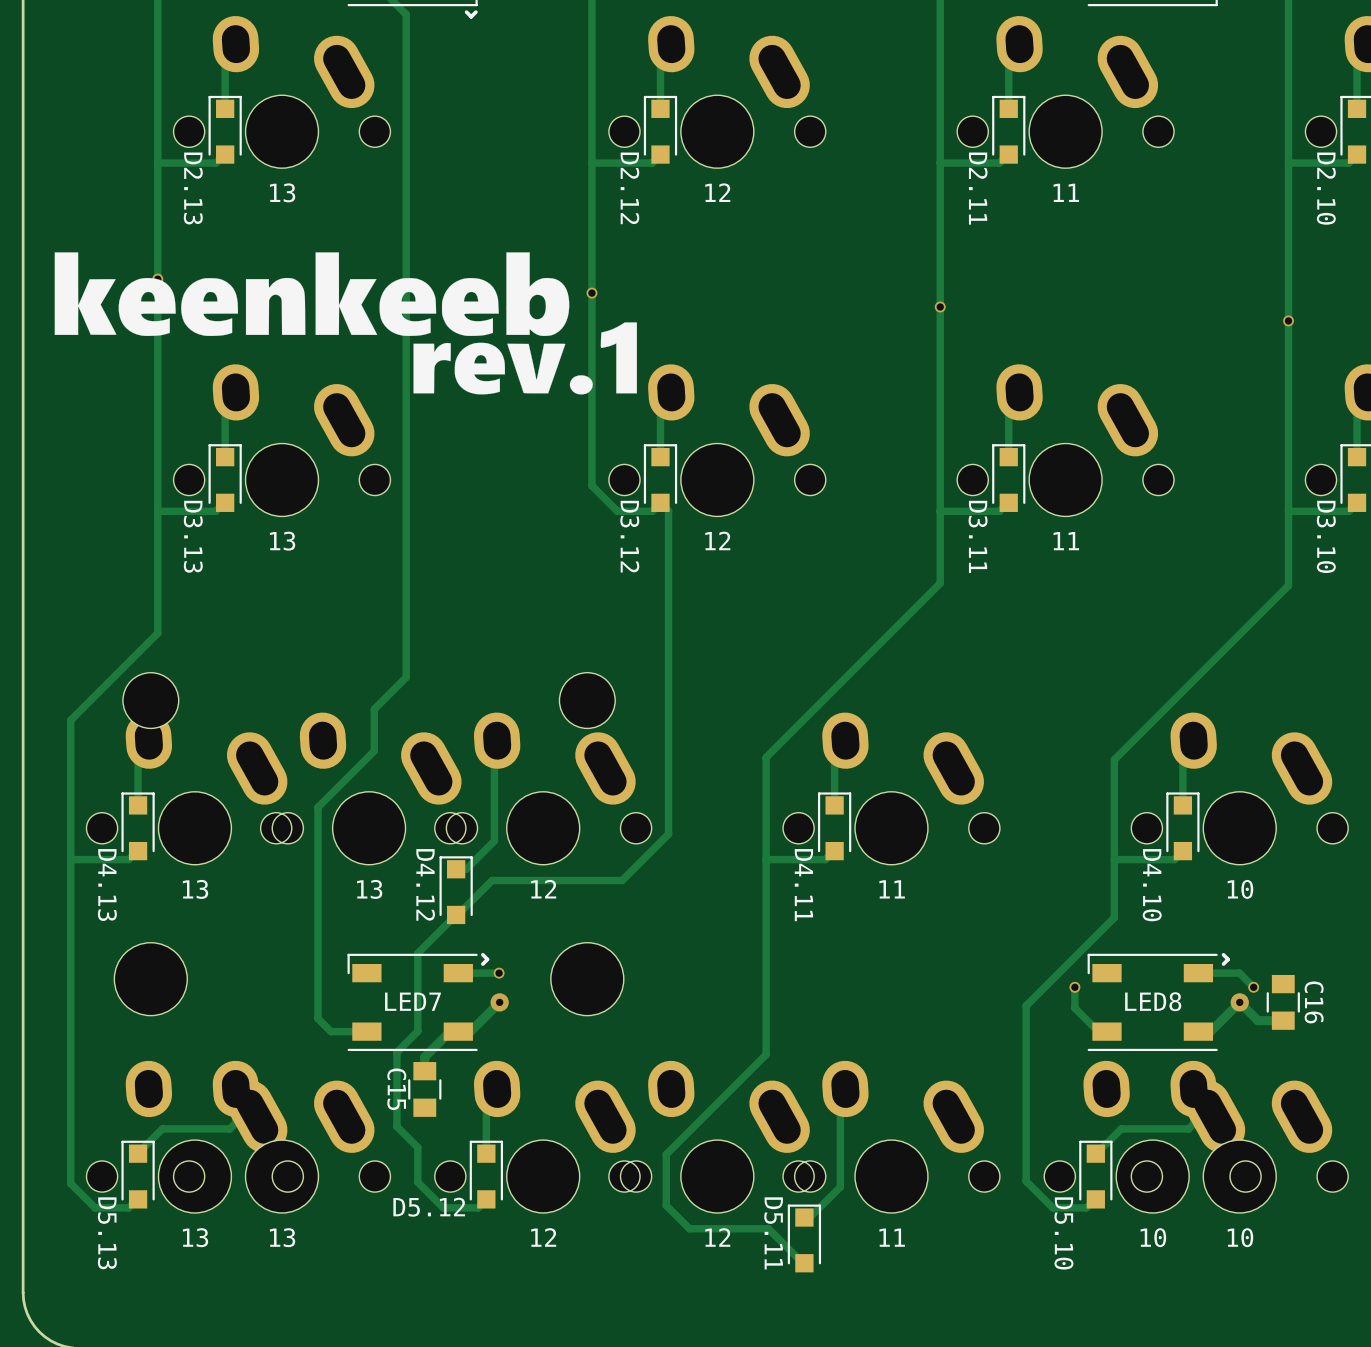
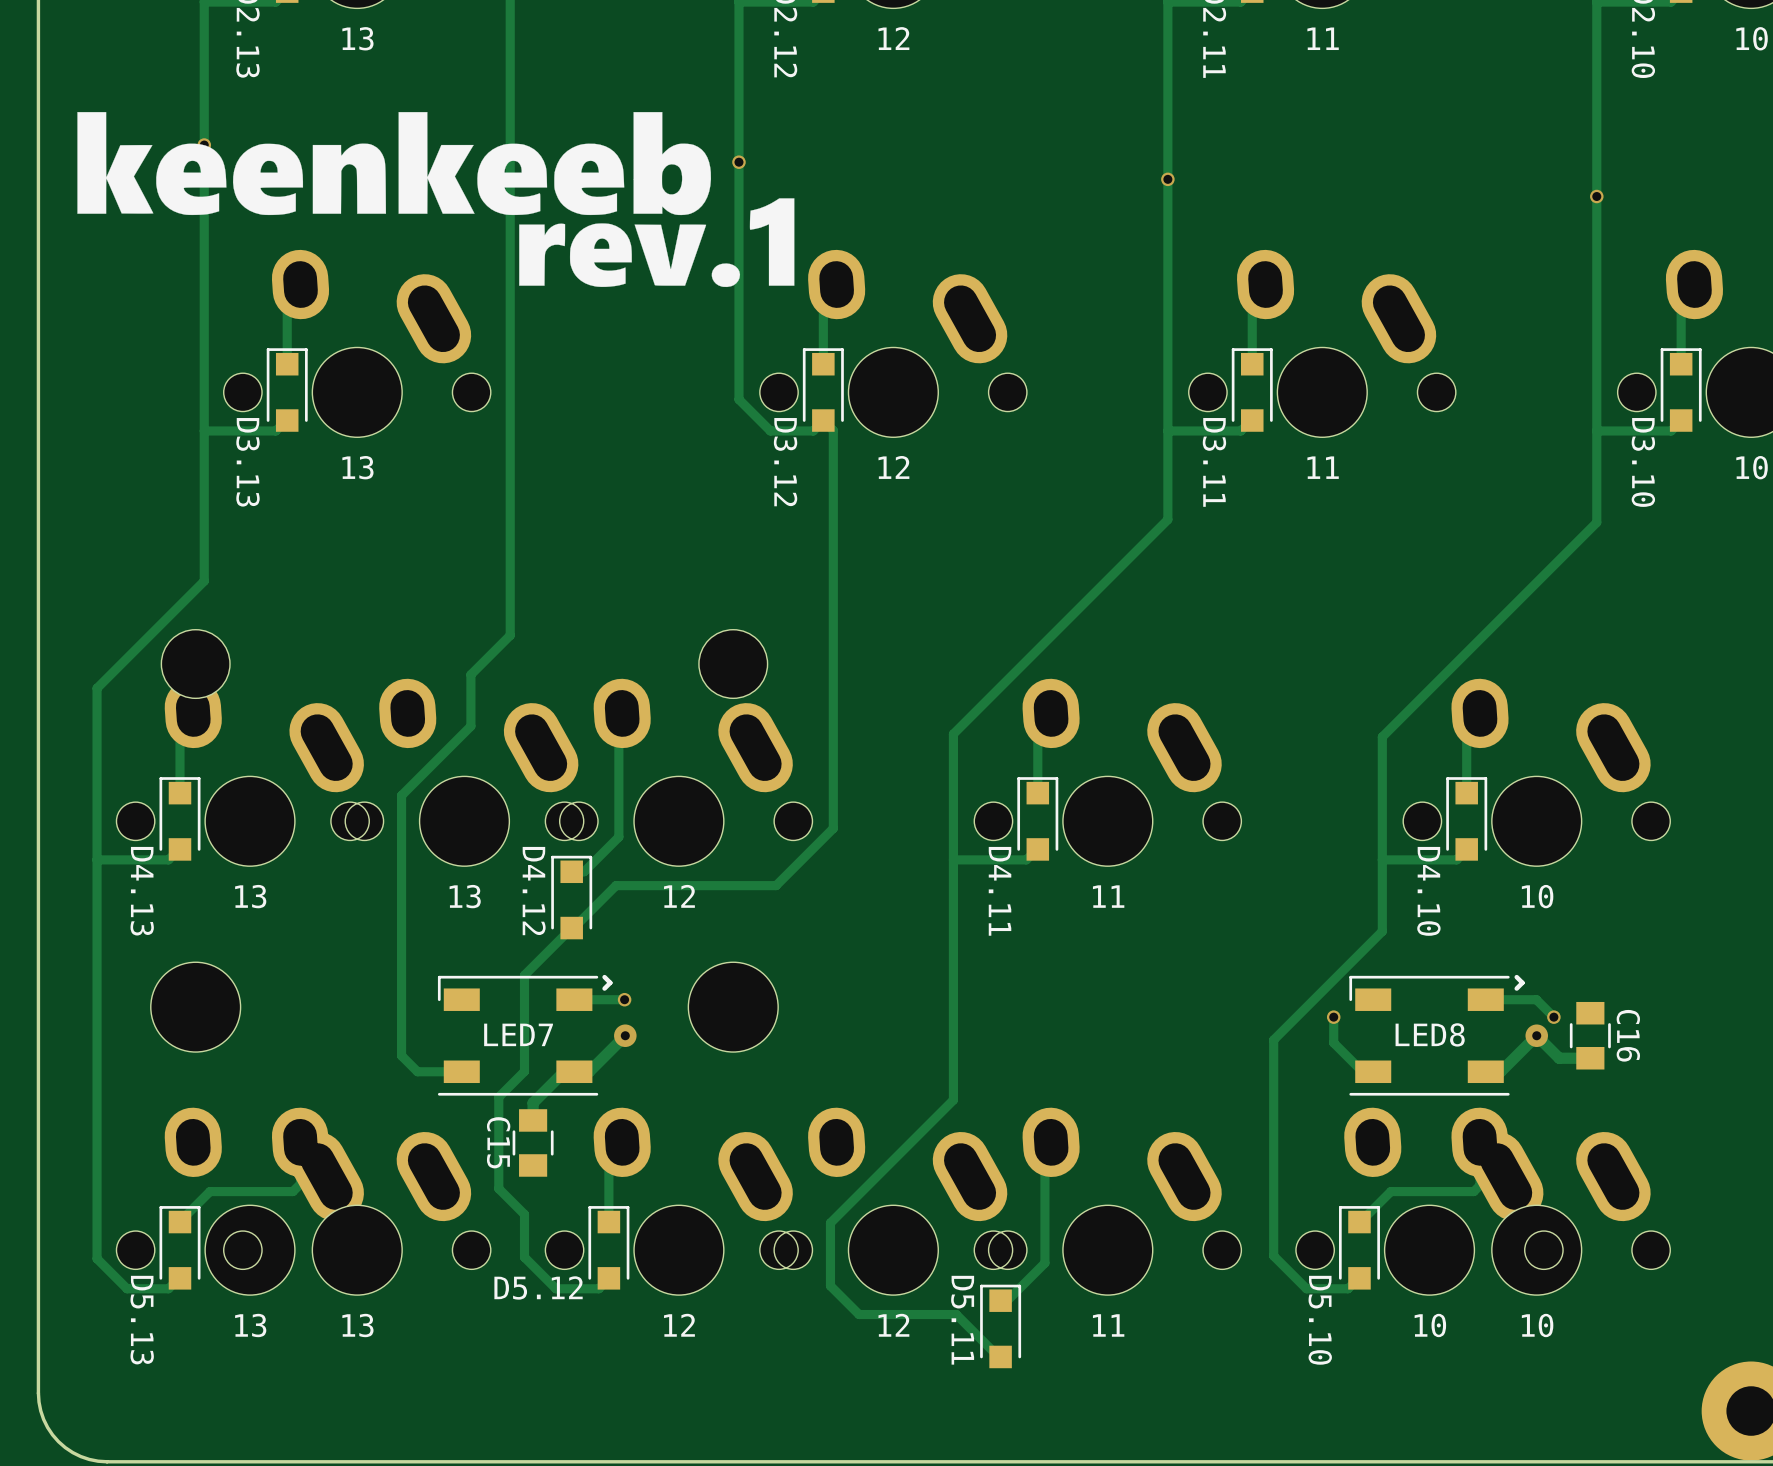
part footprint: [86, 1060, 304, 1213] -> [116, 1107, 364, 1296]
part: (1239, 1136) -> none

